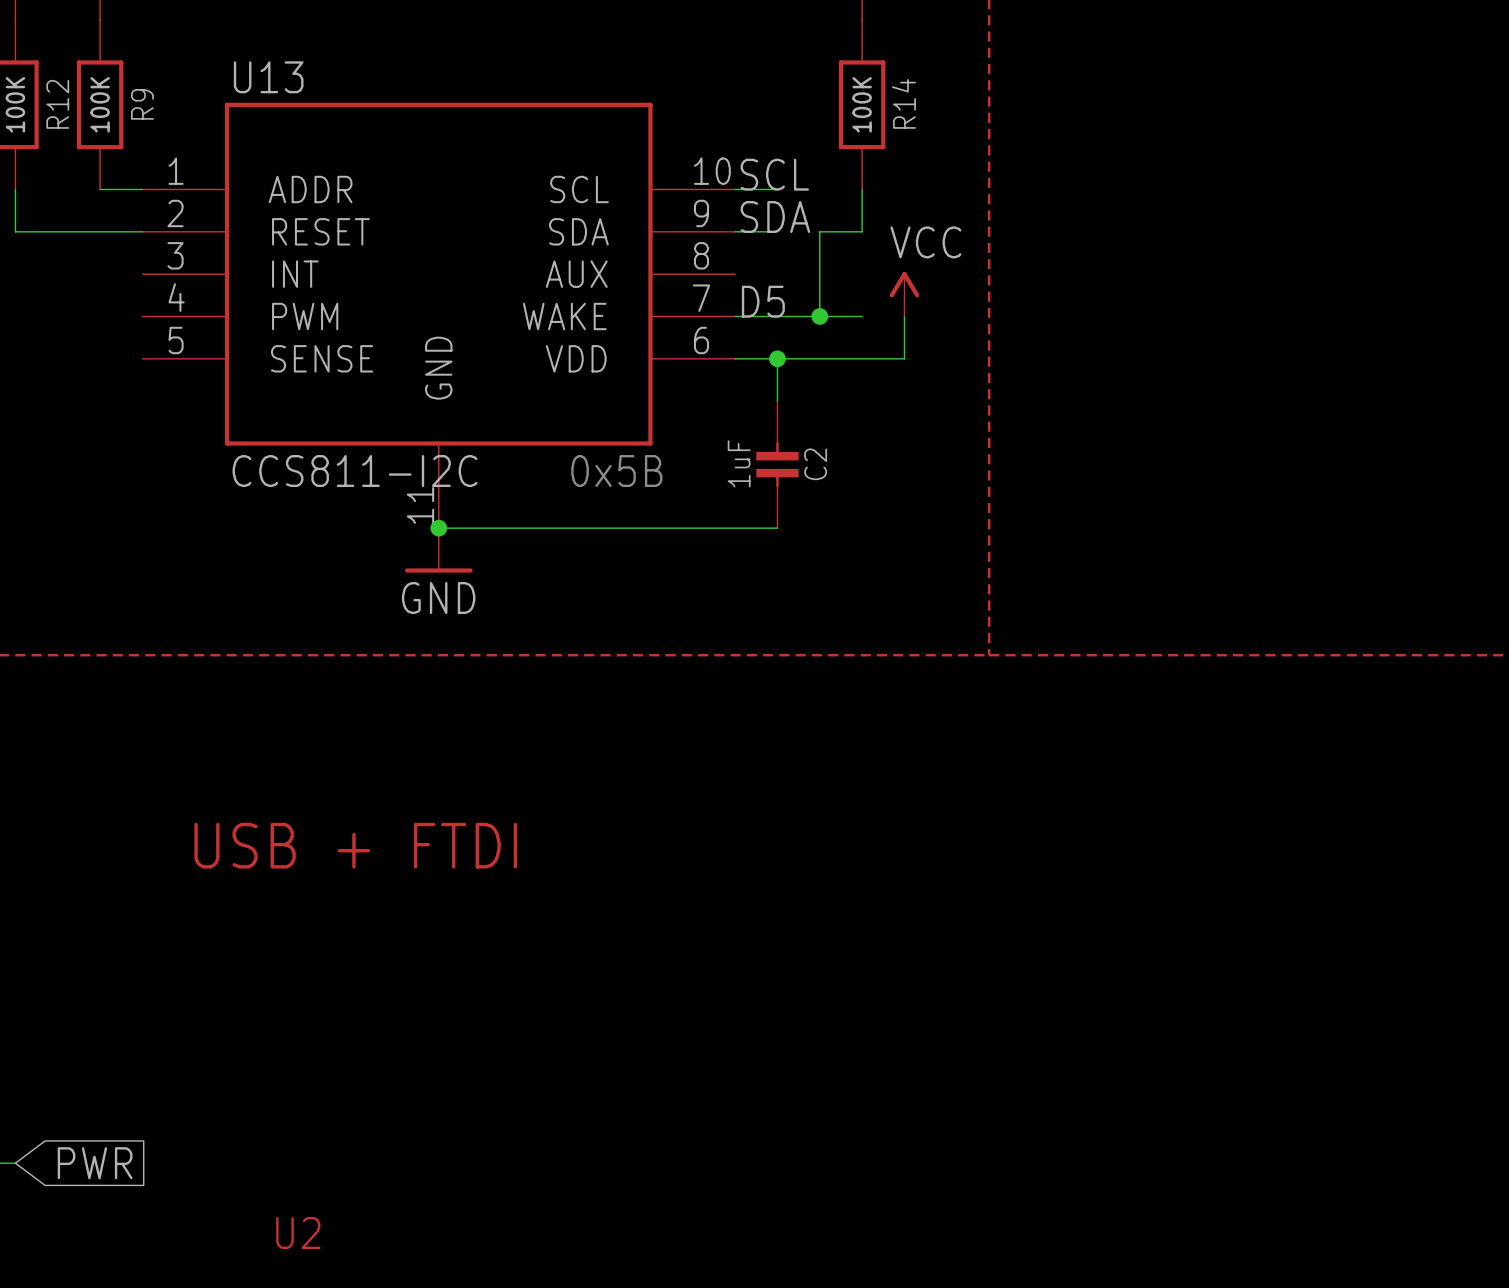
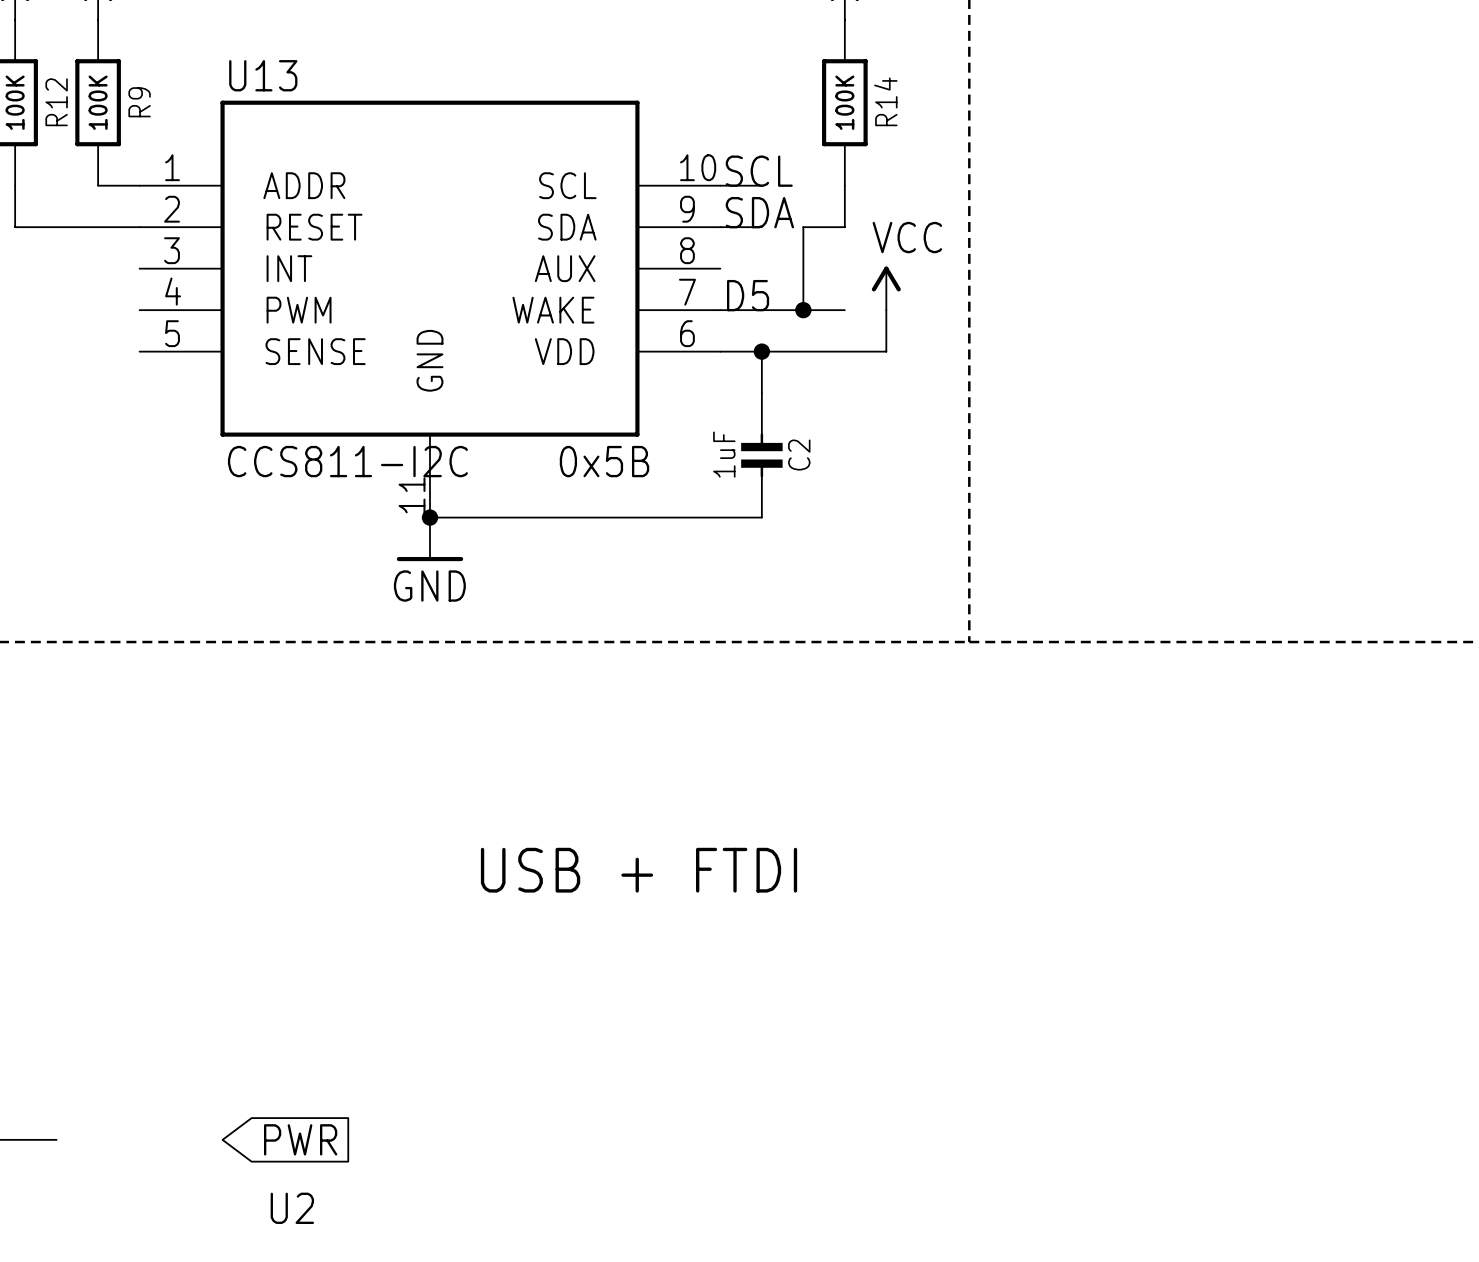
text position: USB + FTDI (355, 845) -> USB + FTDI (639, 870)
wire: none -> (15, 1139) (56, 1139)
global label position: PWR (95, 1163) -> PWR (300, 1139)

